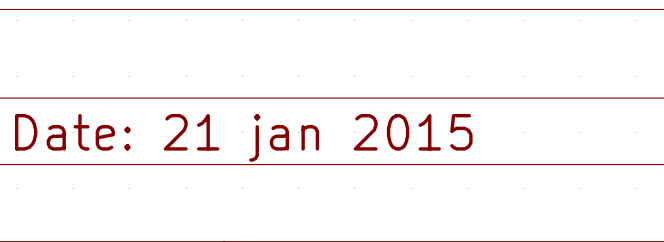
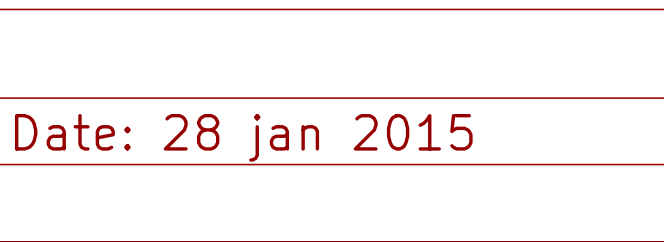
title block: Date: 21 jan 2015 (243, 137) -> Date: 28 jan 2015 (243, 137)

